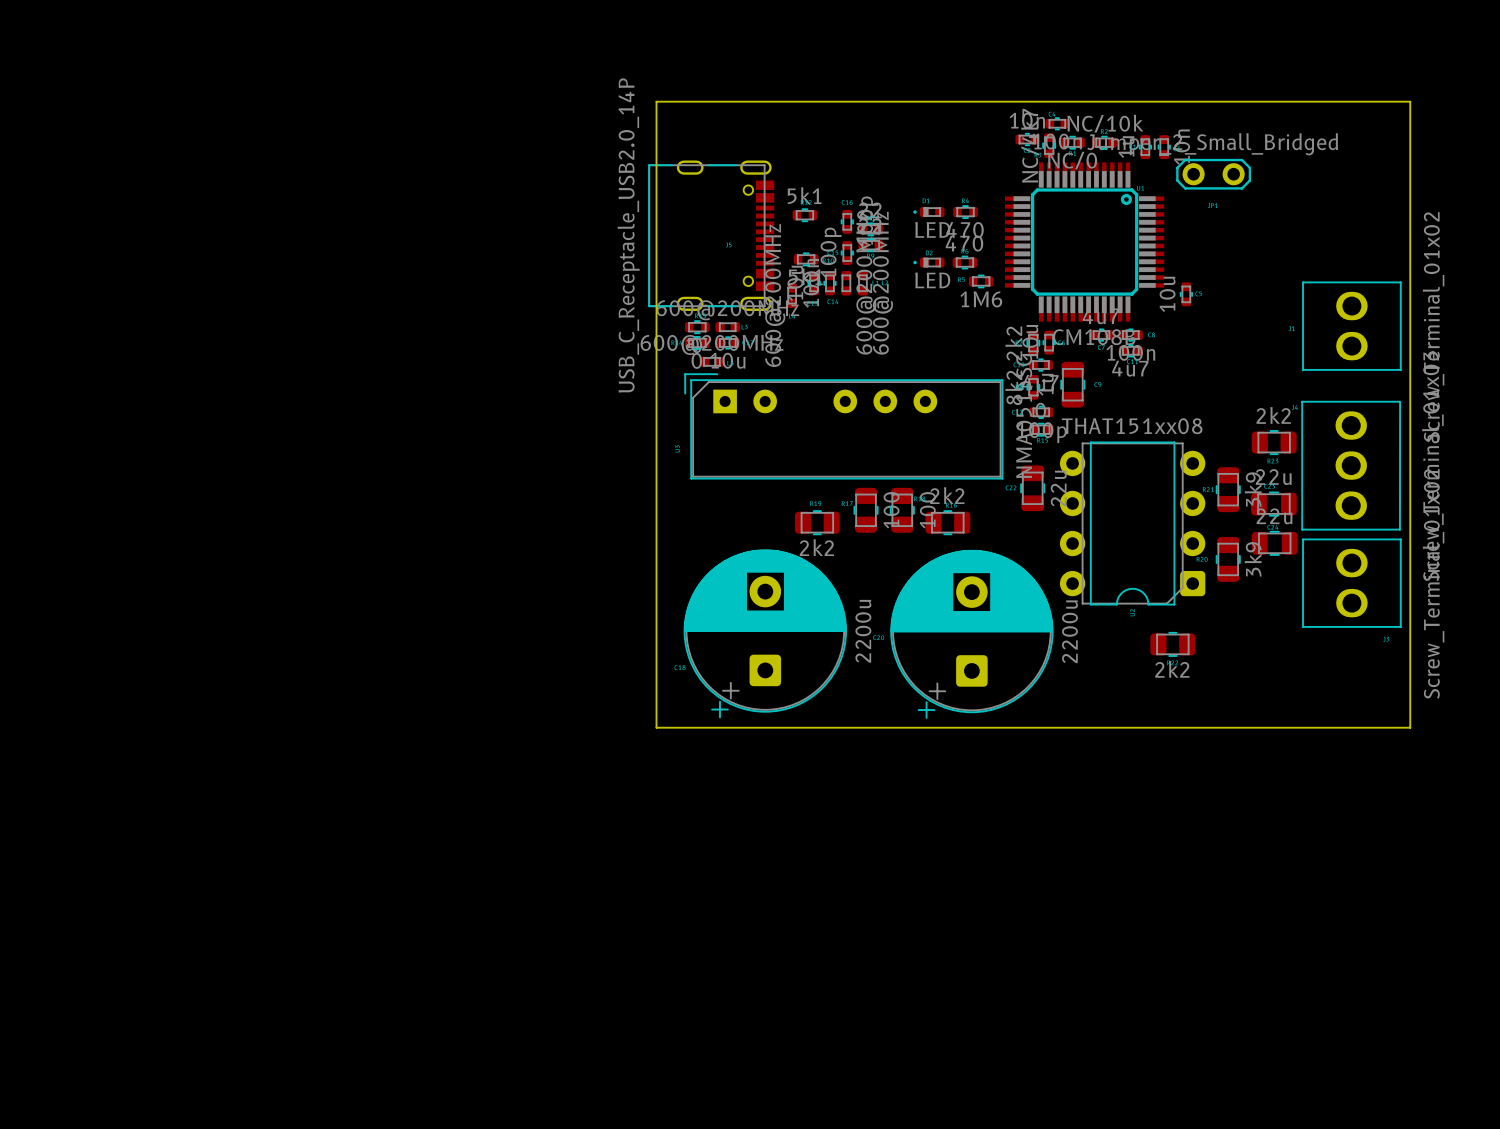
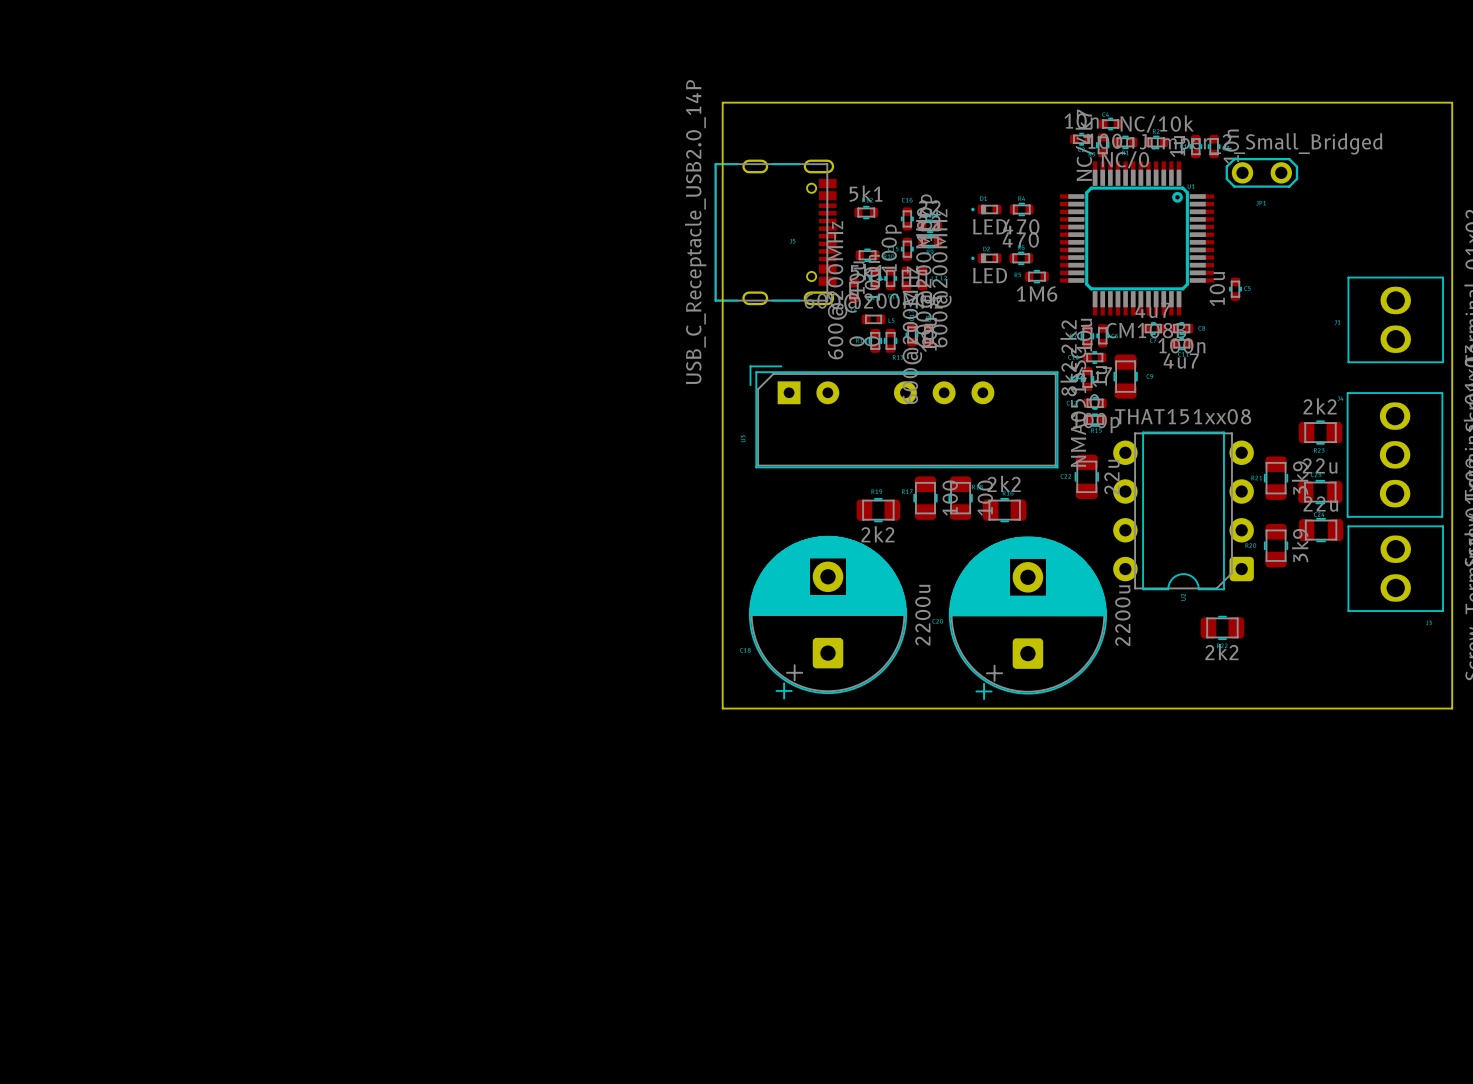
part rotation: 0° (697, 327) -> 90° clockwise (890, 340)
part position: (697, 327) -> (890, 340)
part rotation: 0° (727, 327) -> 90° clockwise (928, 335)
part position: (727, 327) -> (928, 335)
part rotation: 0° (697, 342) -> 90° clockwise (875, 340)
part position: (697, 342) -> (875, 340)
part rotation: 0° (727, 342) -> 90° clockwise (911, 334)
part position: (727, 342) -> (911, 334)
part position: (711, 361) -> (873, 319)

